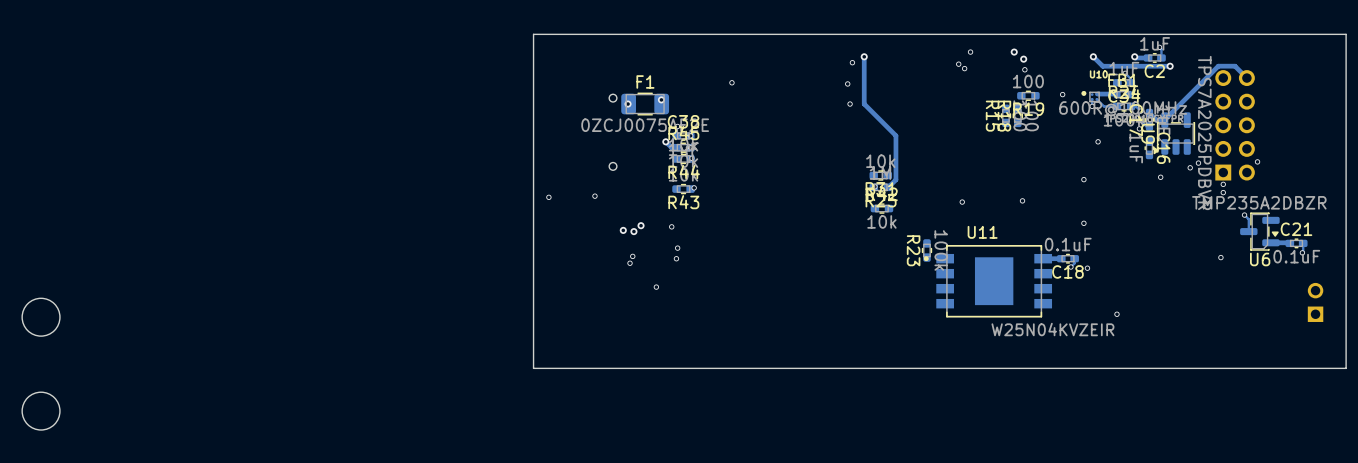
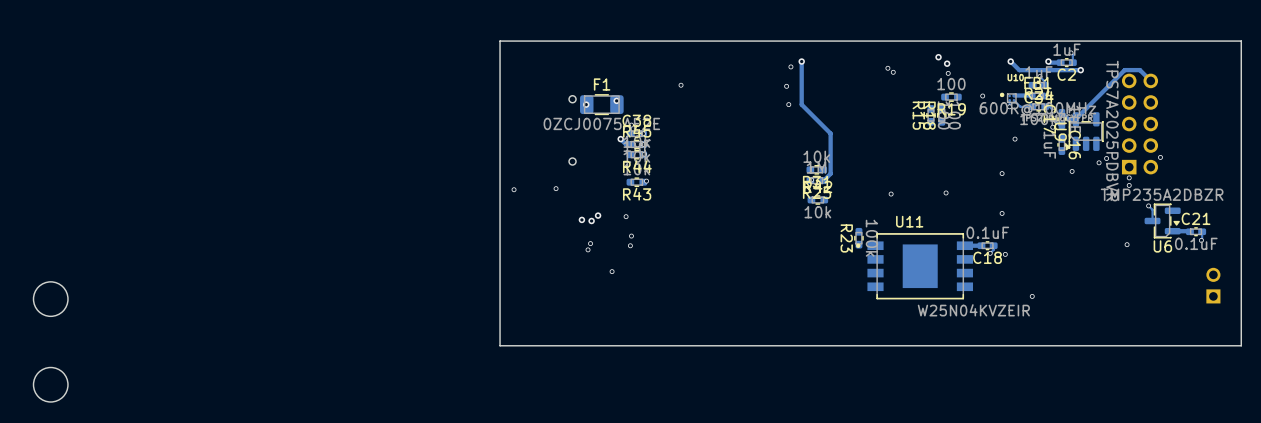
via: (970, 52) -> none

